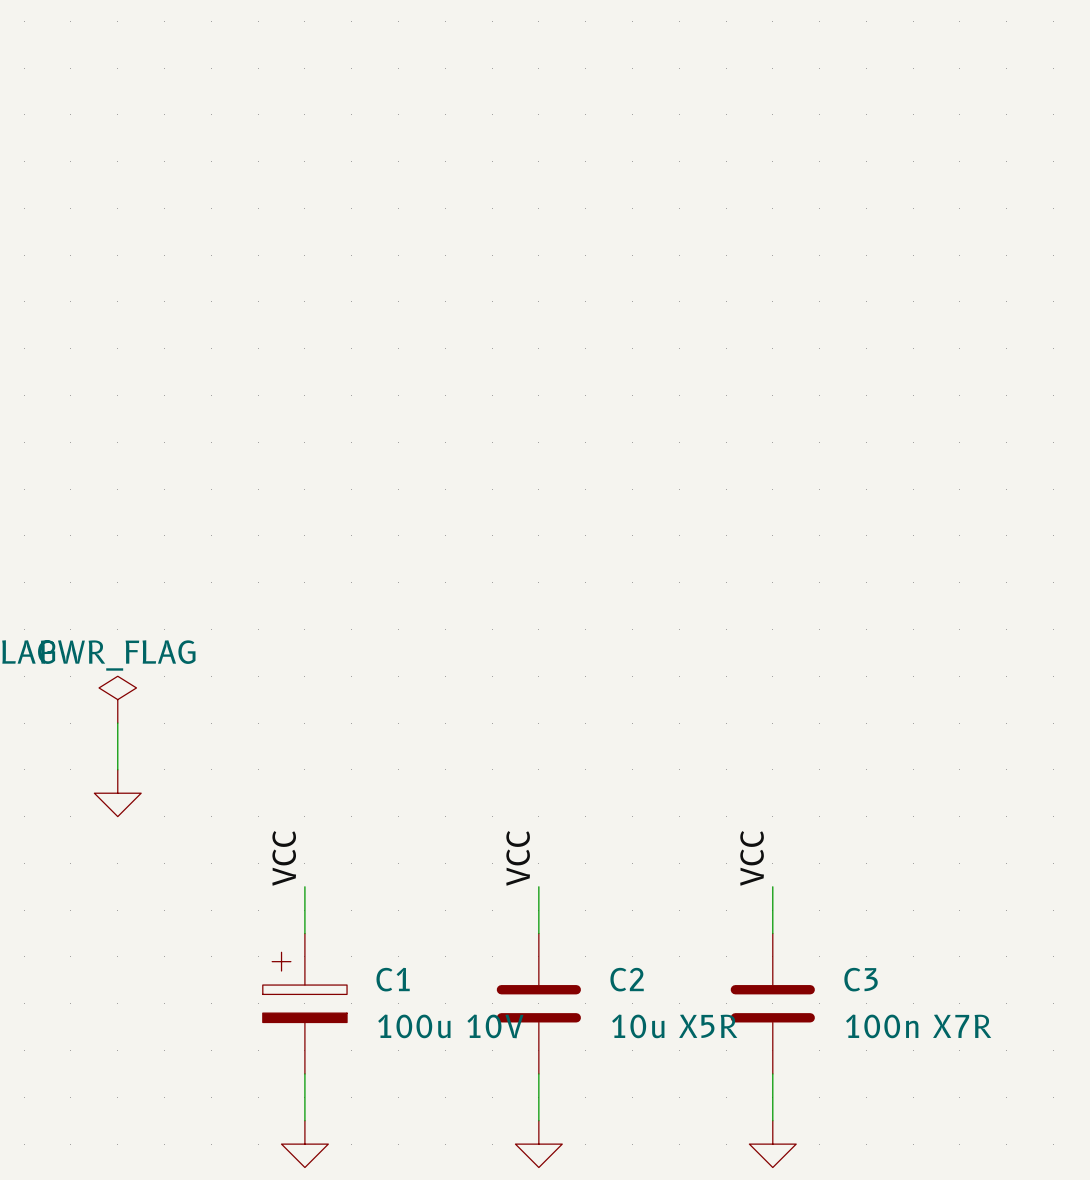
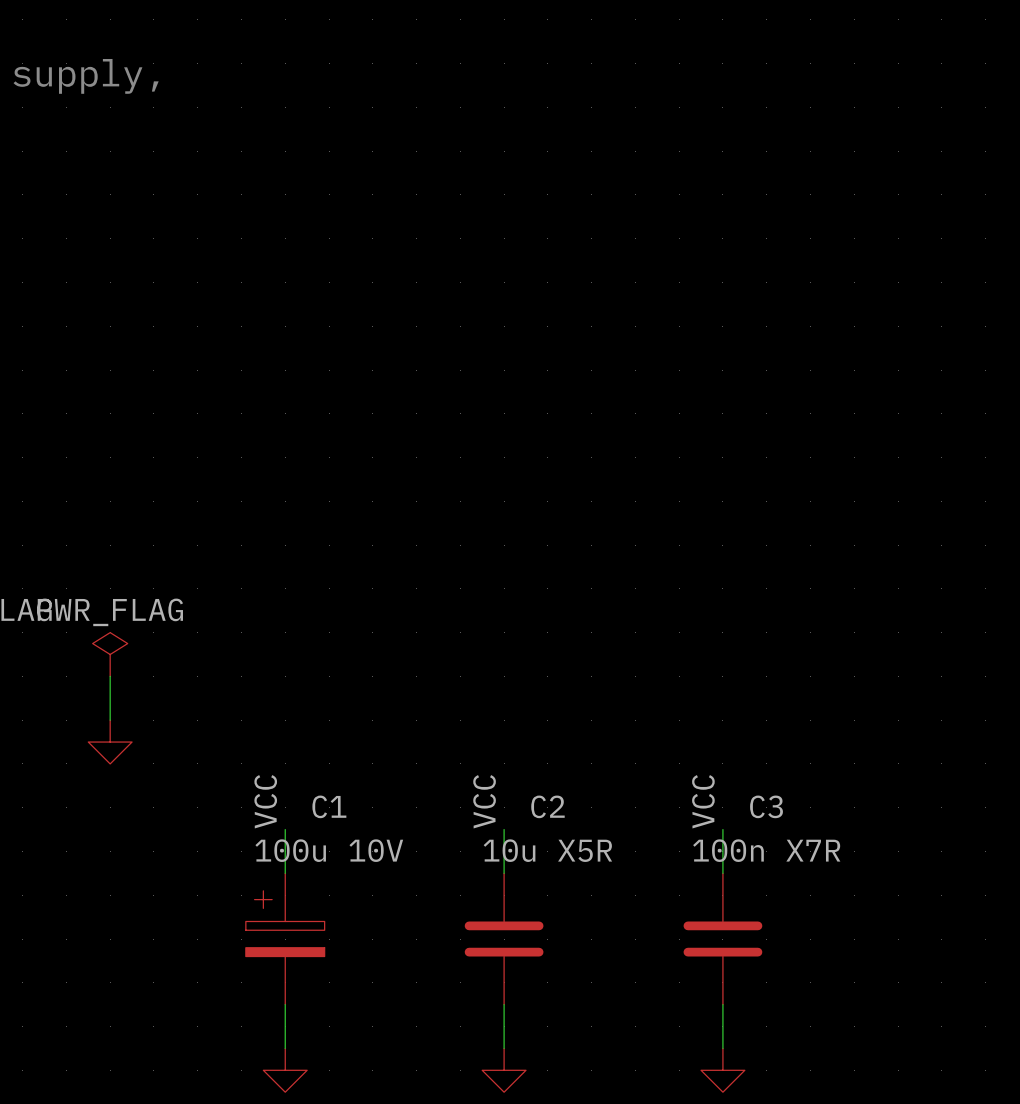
C1 name position: C1 (393, 979) -> C1 (329, 806)
C2 name position: C2 (627, 979) -> C2 (547, 806)
C3 name position: C3 (861, 979) -> C3 (766, 806)
C1 value position: 100u 10V (450, 1026) -> 100u 10V (329, 850)
C2 value position: 10u X5R (674, 1026) -> 10u X5R (547, 850)
C3 value position: 100n X7R (918, 1026) -> 100n X7R (766, 850)

